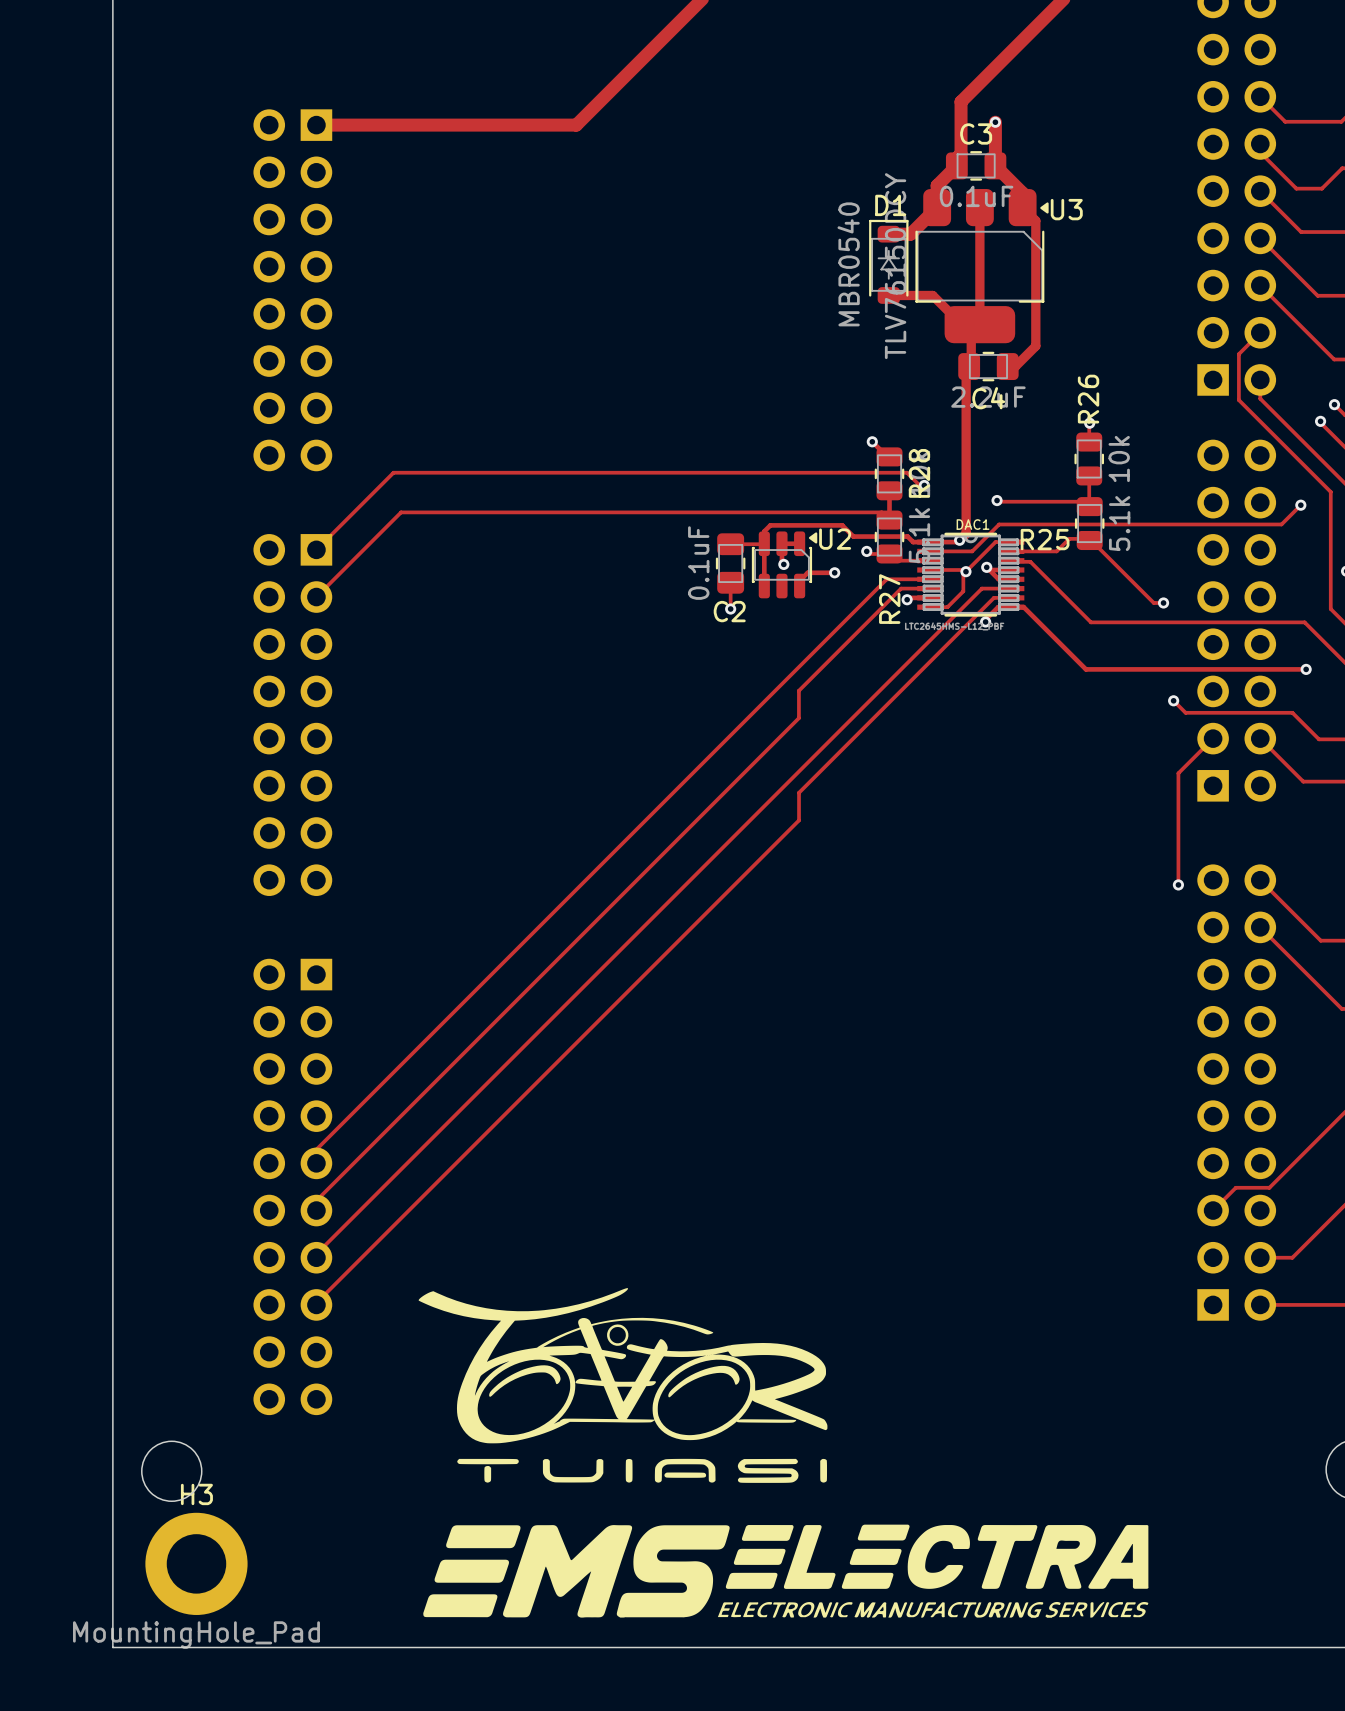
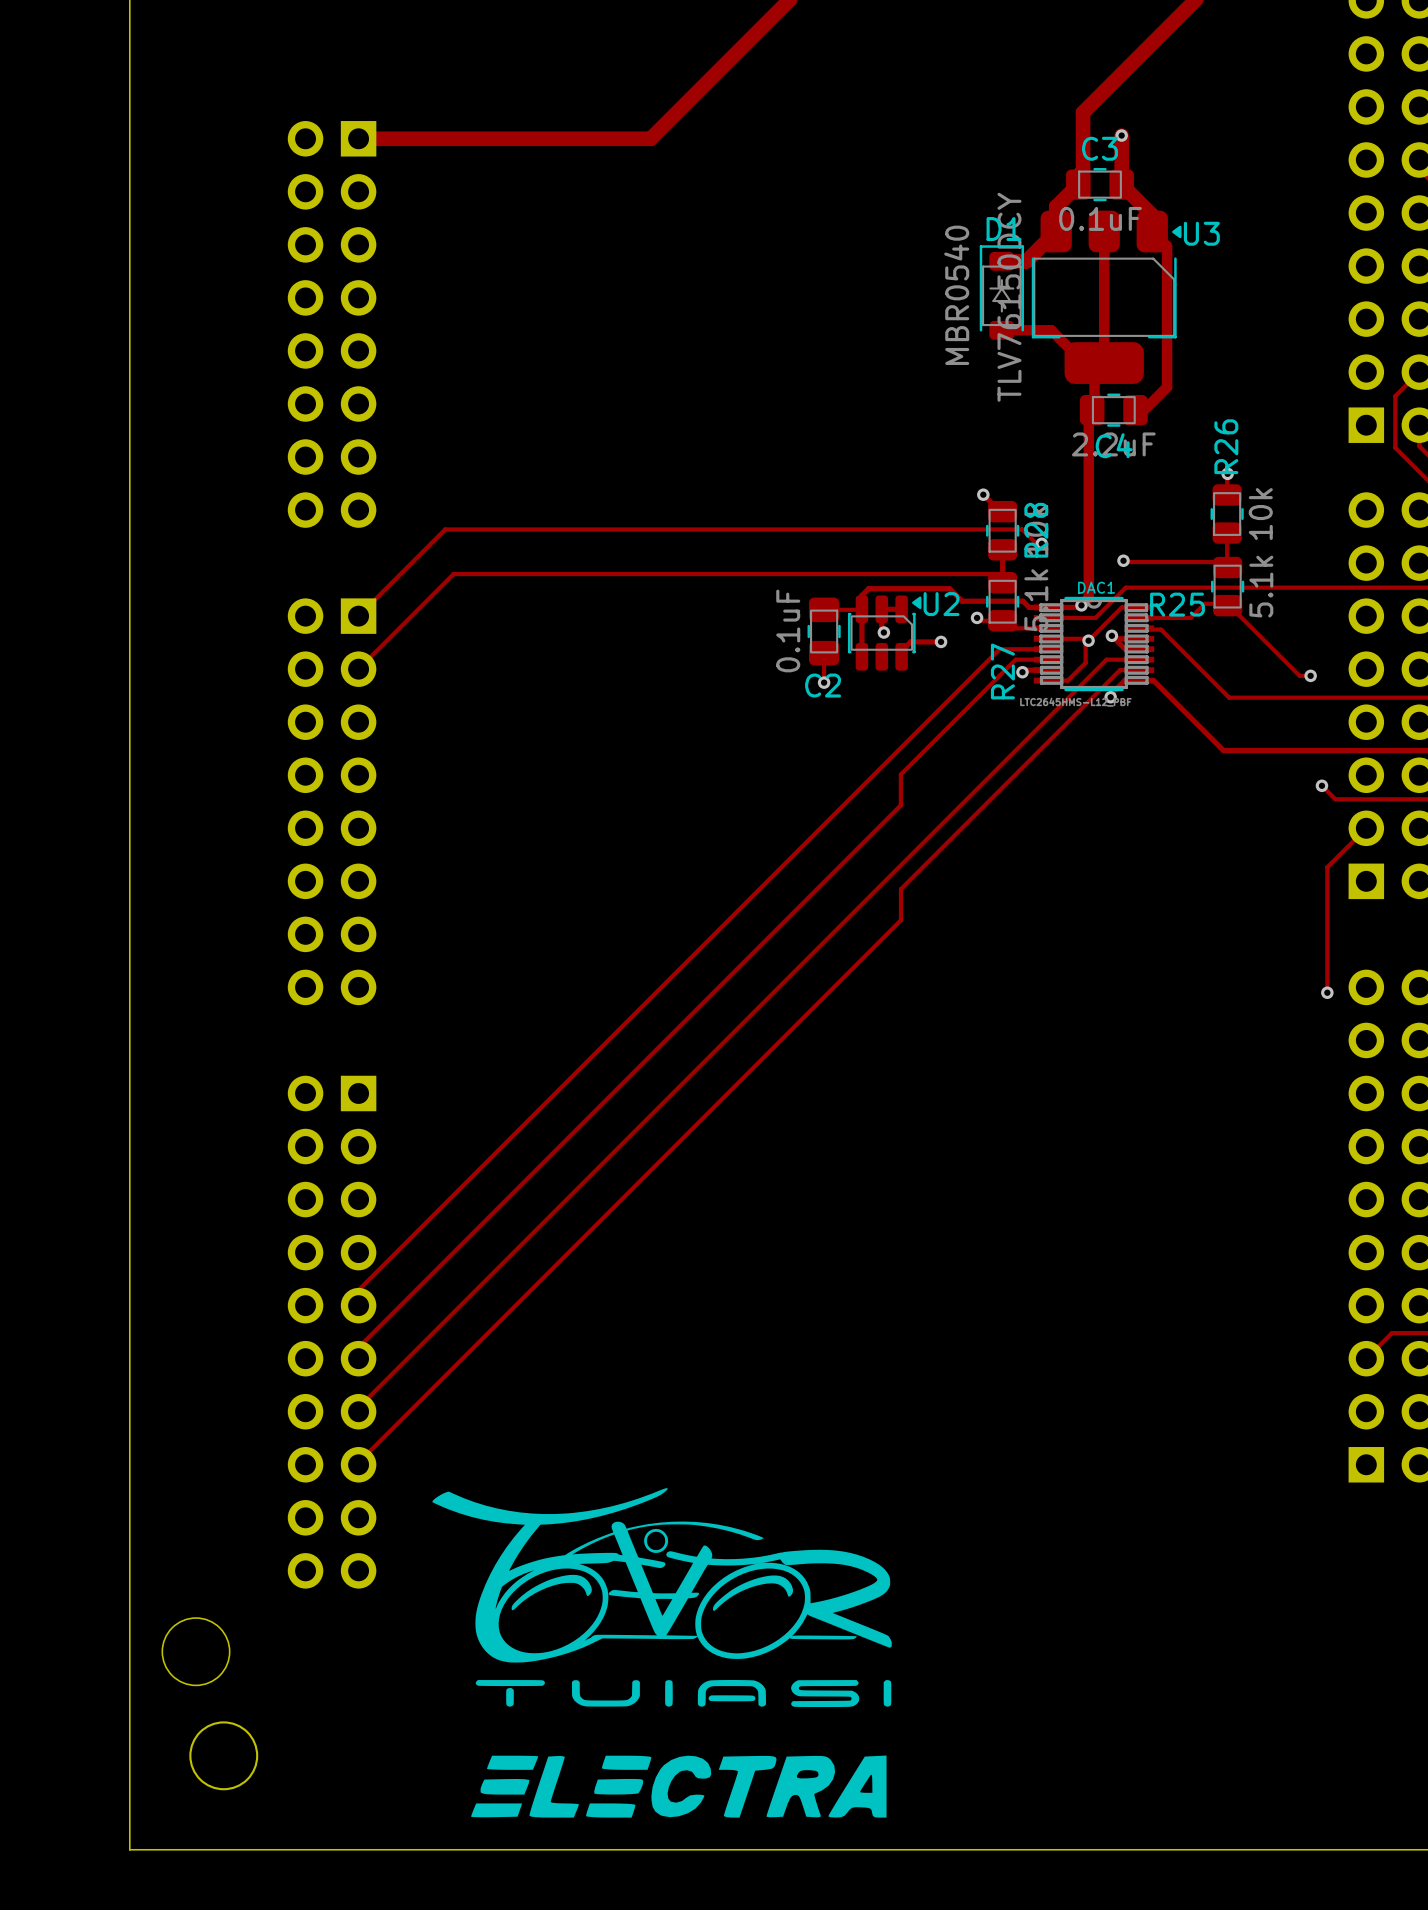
drawing position: (623, 1385) -> (662, 1597)
drawing: [423, 1524, 1149, 1618] -> none
round board edge: none -> [189, 1721, 259, 1791]
H3: MountingHole_Pad (196, 1563) -> none
drawing: none -> [471, 1755, 887, 1818]

